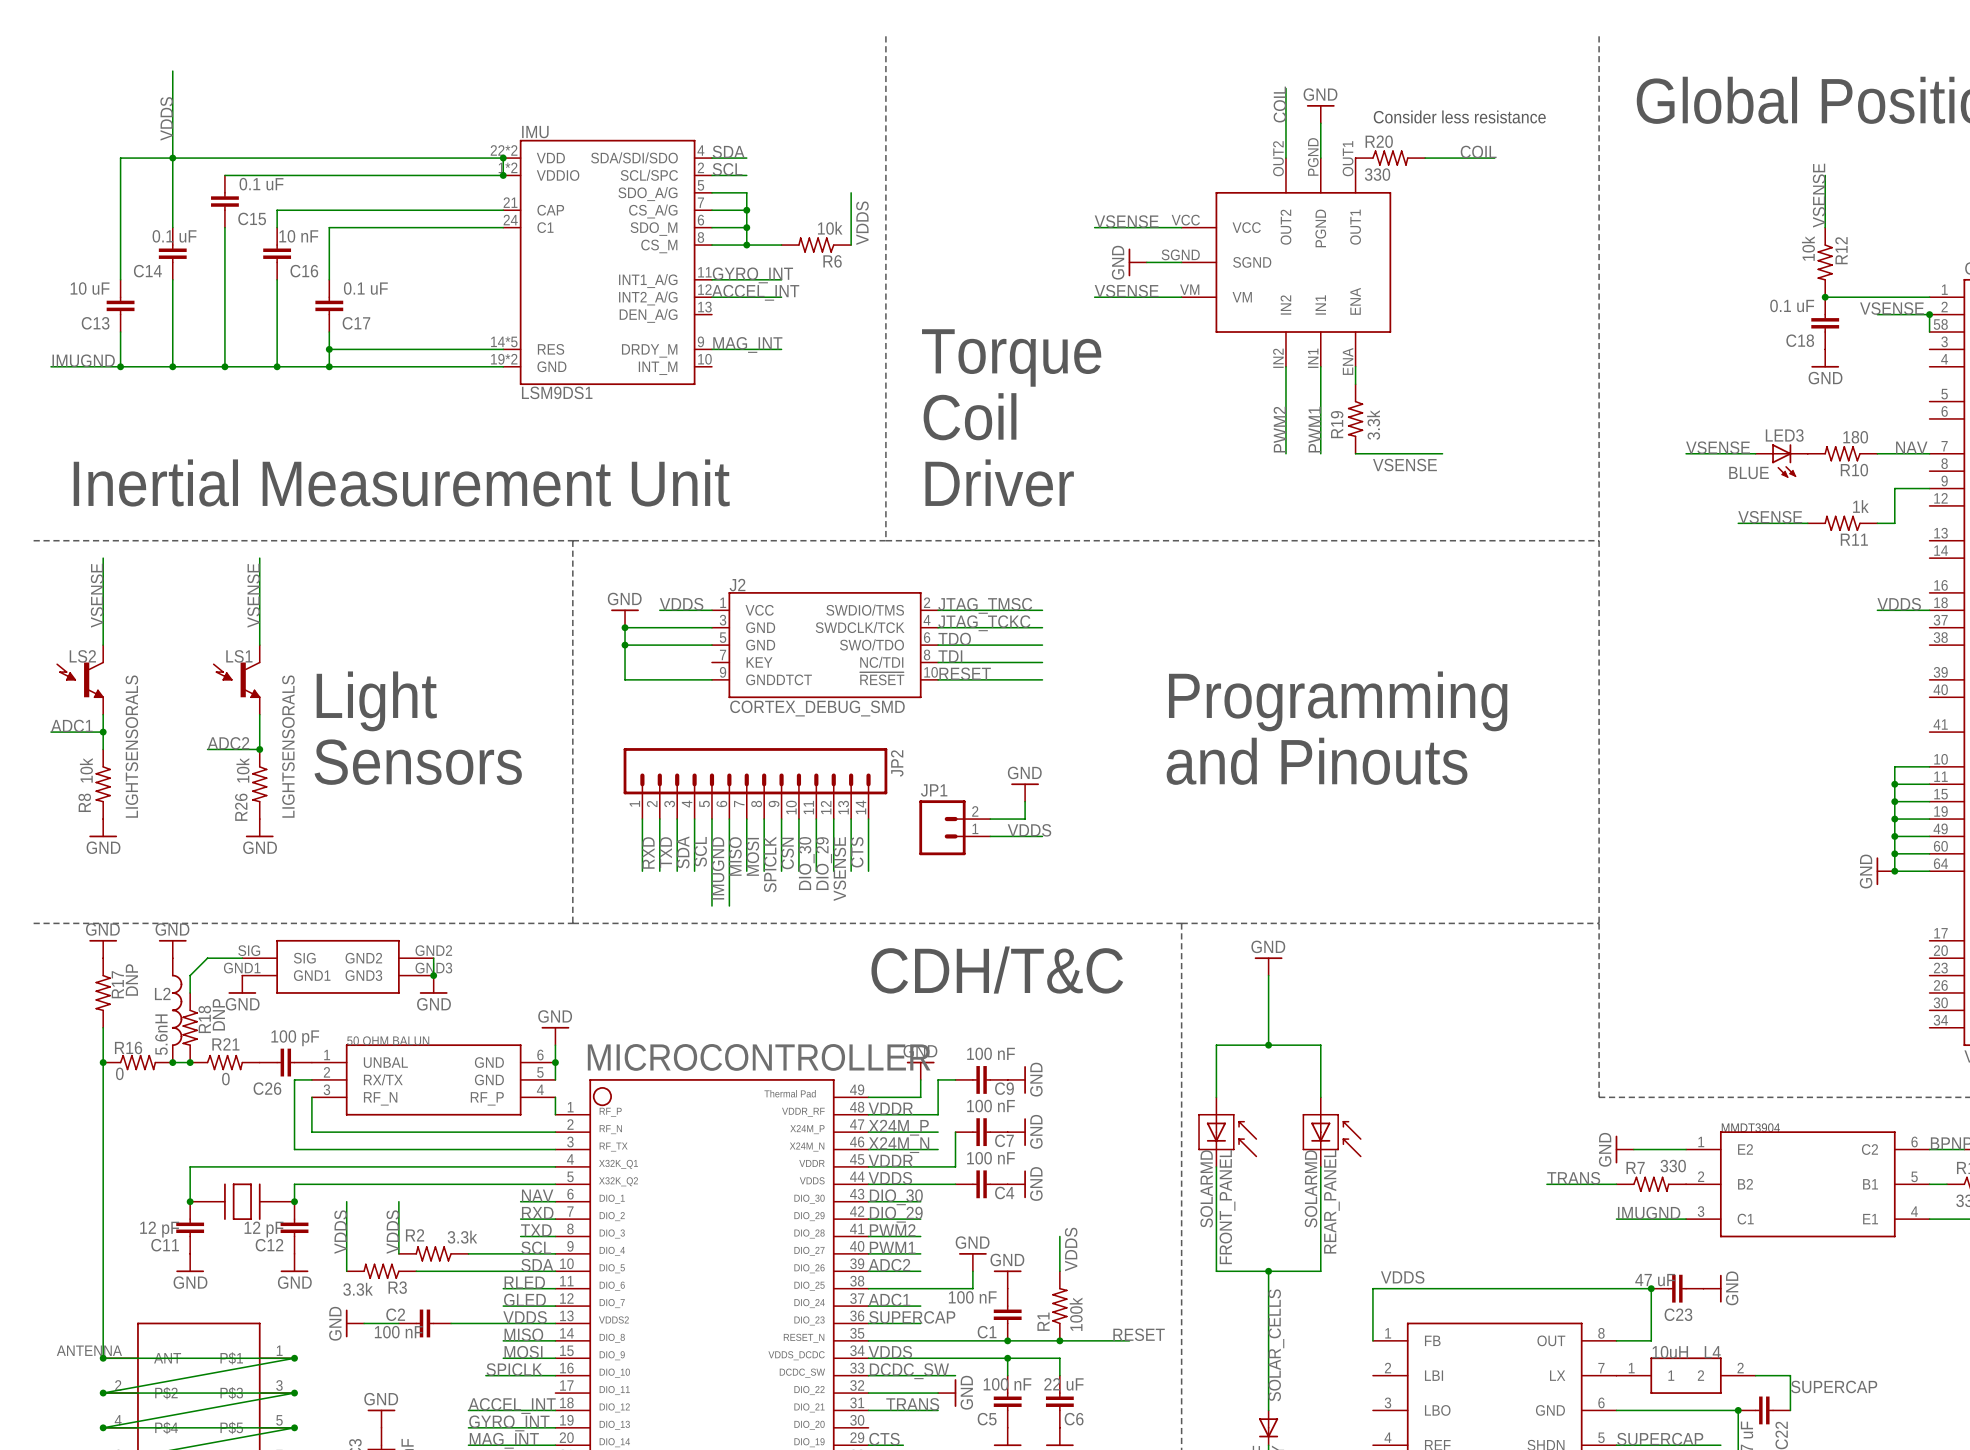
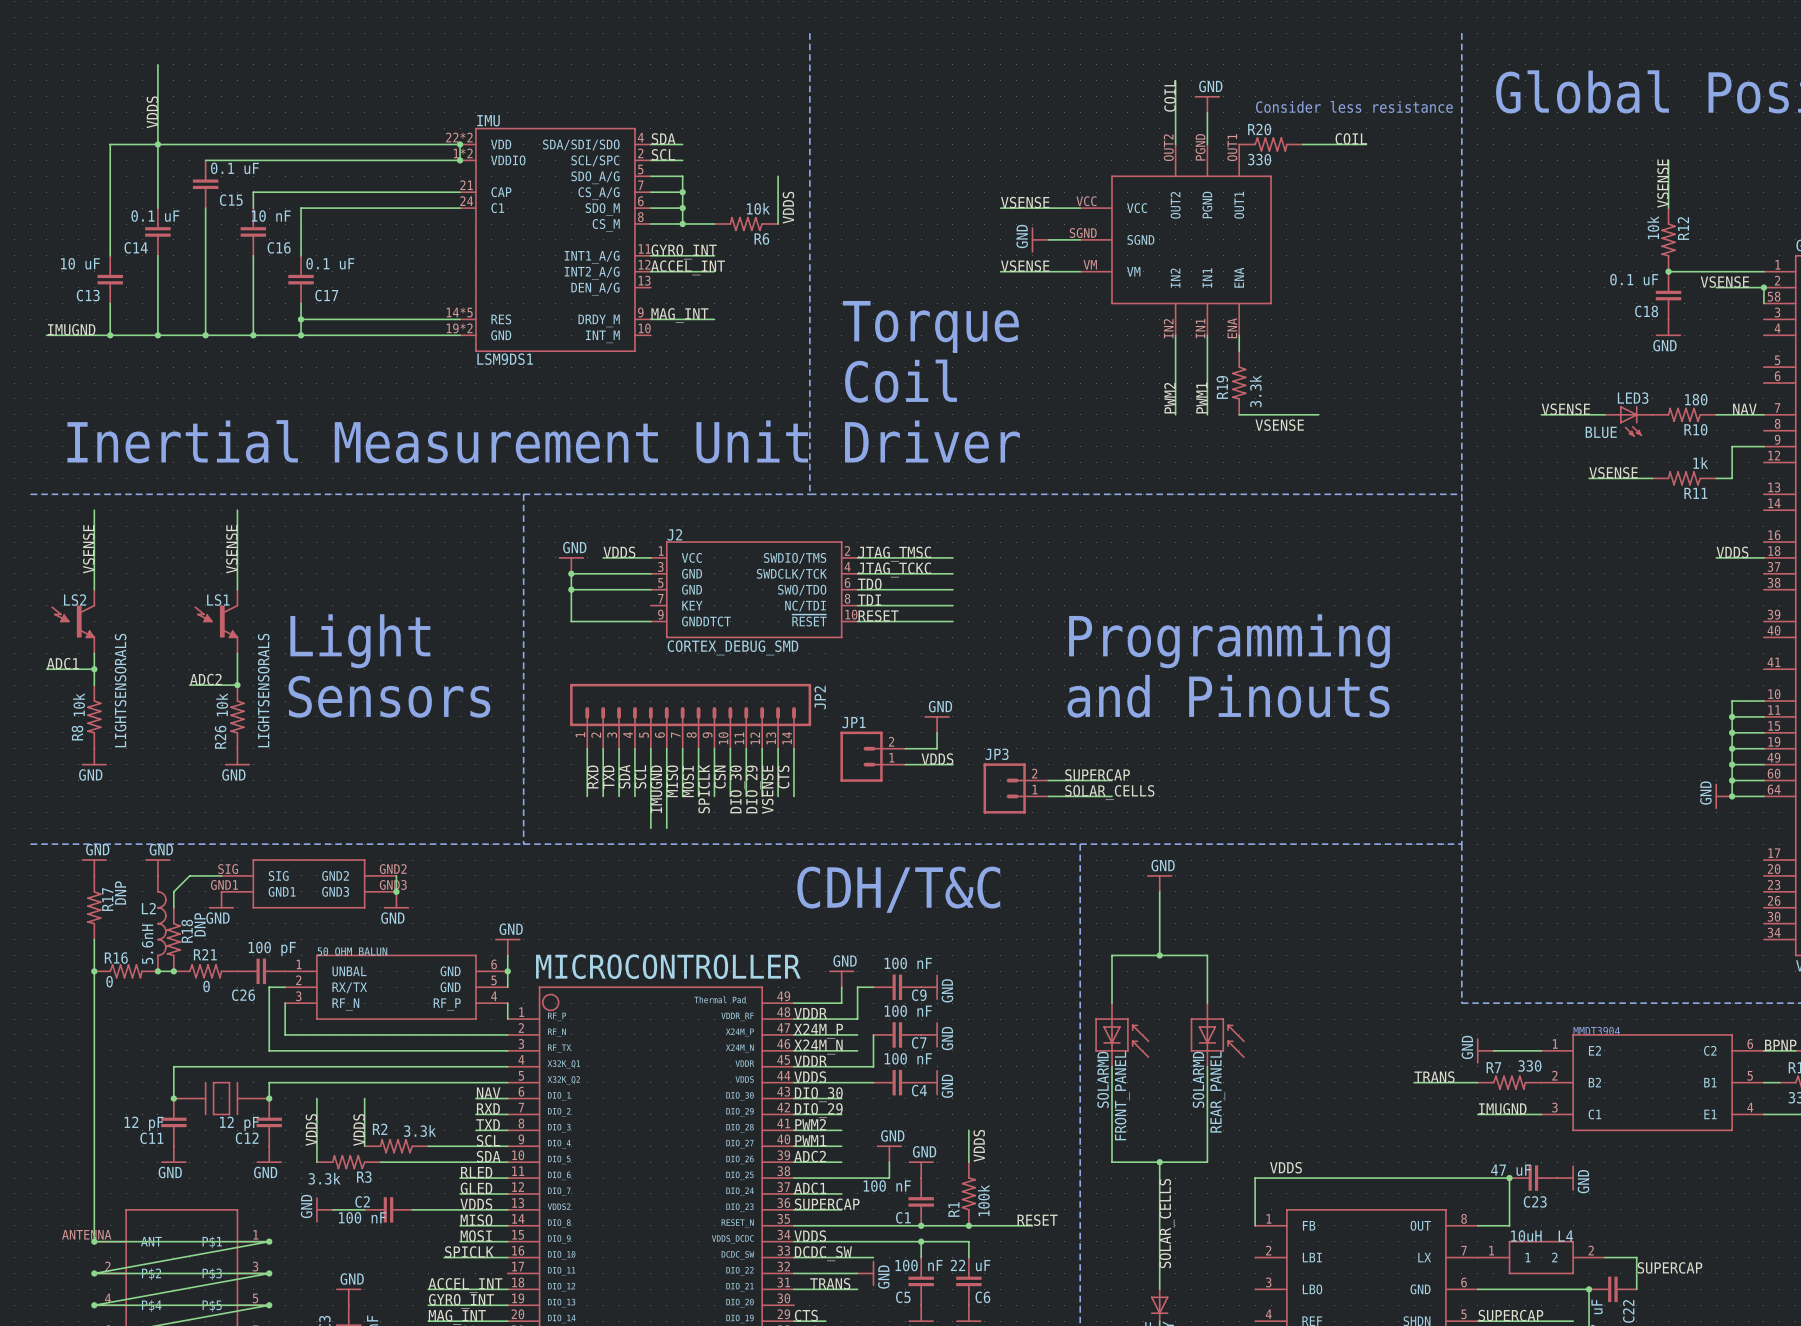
label: none -> SUPERCAP (1097, 774)
wire: none -> (1048, 780) (1111, 780)
JP3: none -> (1015, 788)
label: none -> SOLAR_CELLS (1109, 792)
wire: none -> (1048, 796) (1111, 796)

